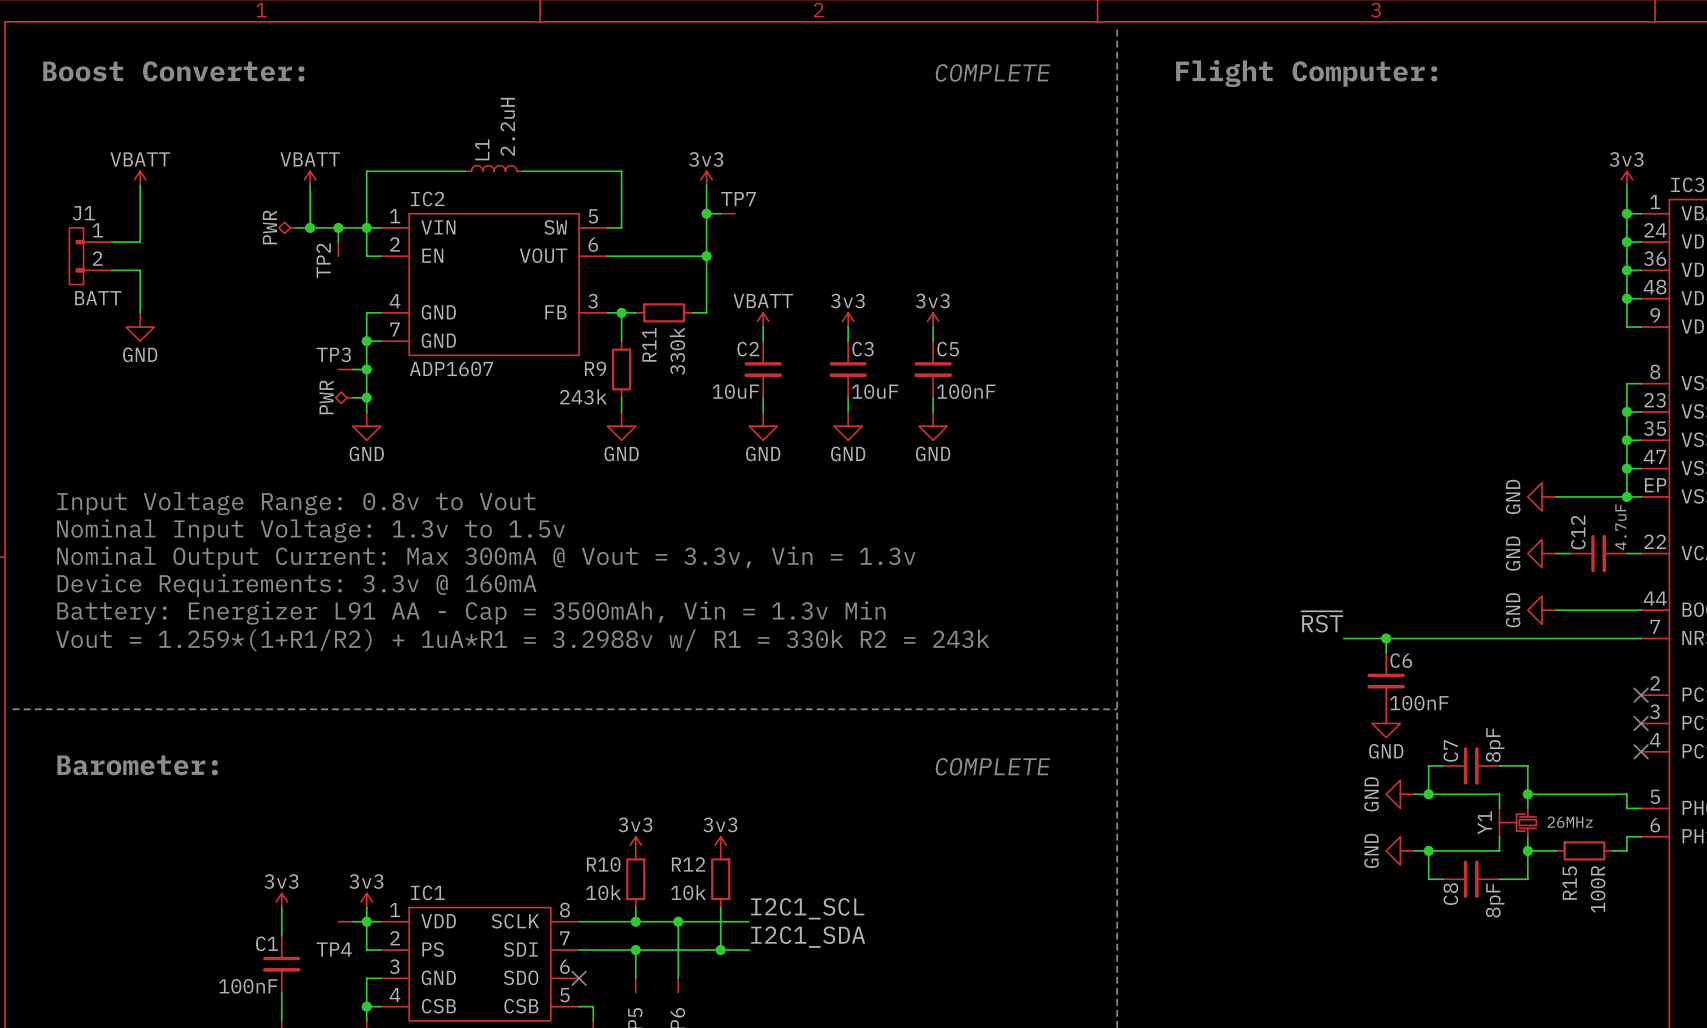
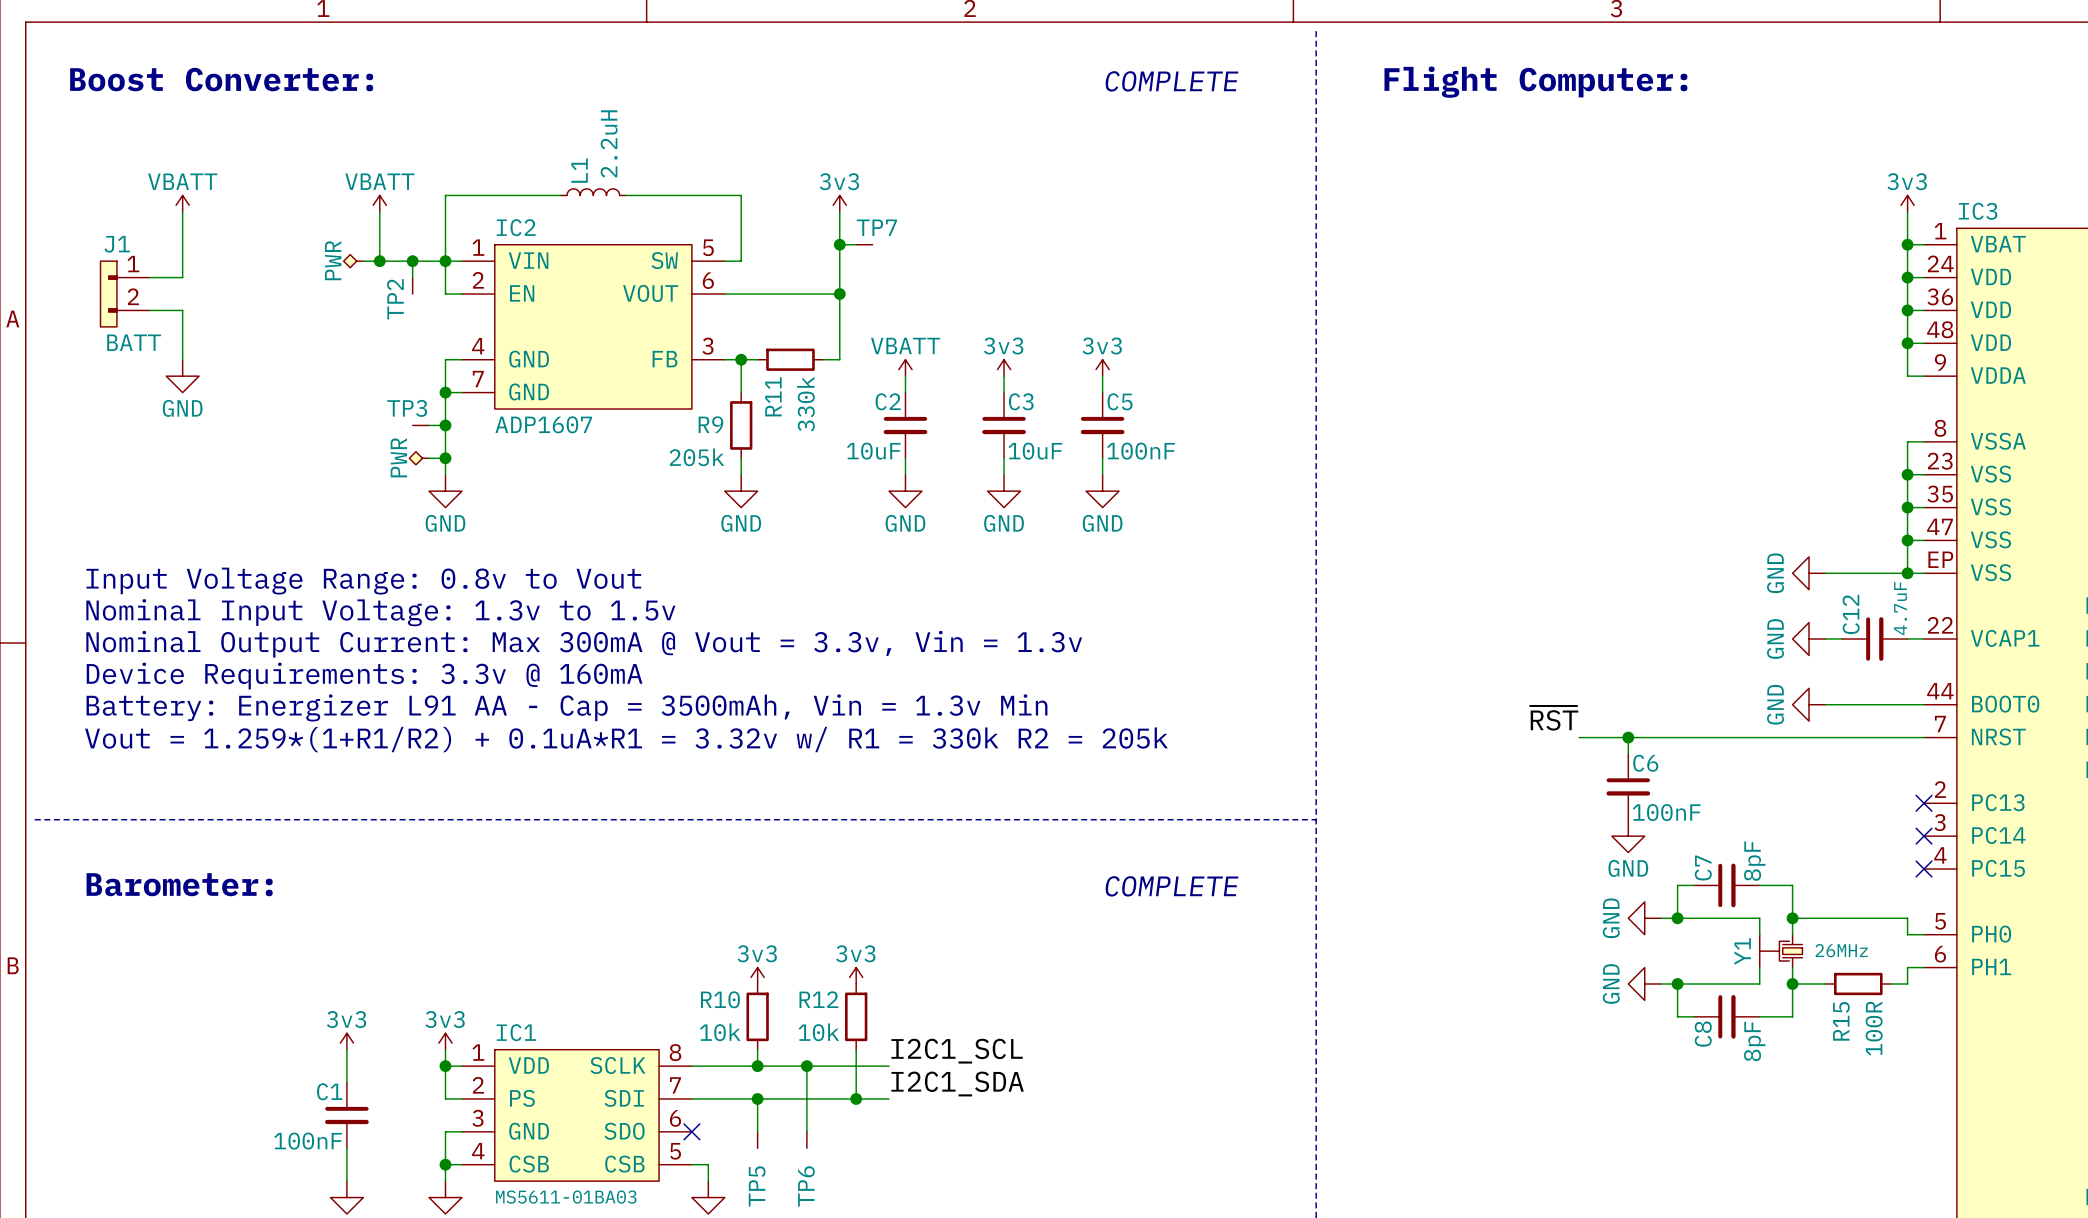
R9 value: 243k (583, 396) -> 205k (696, 457)
text: Vout = 1.259*(1+R1/R2) + 1uA*R1 = 3.2988v w/ R1 = 330k R2 = 243k (522, 640) -> Vout = 1.259*(1+R1/R2) + 0.1uA*R1 = 3.32v w/ R1 = 330k R2 = 205k (626, 739)
TP4: (342, 921) -> none
wire: (352, 921) (366, 921) -> none

